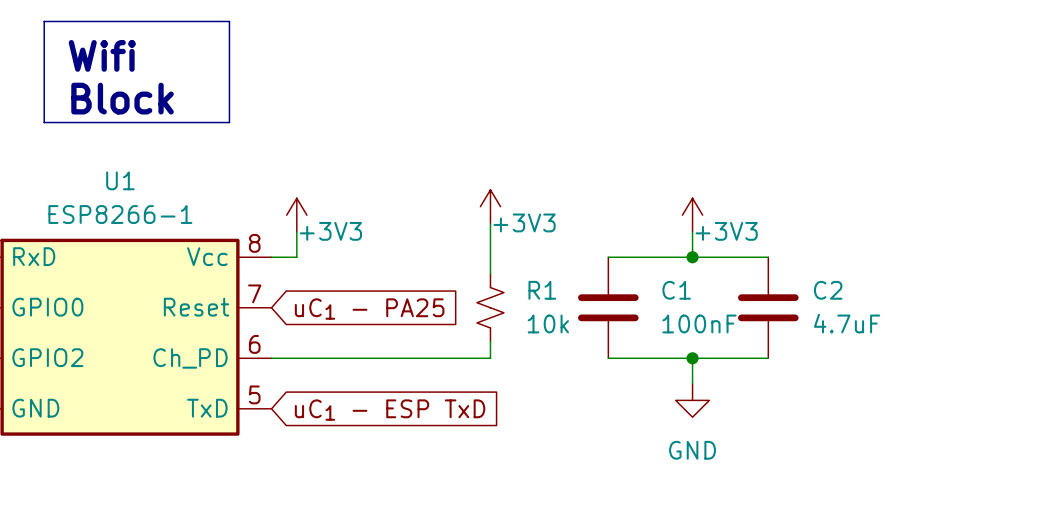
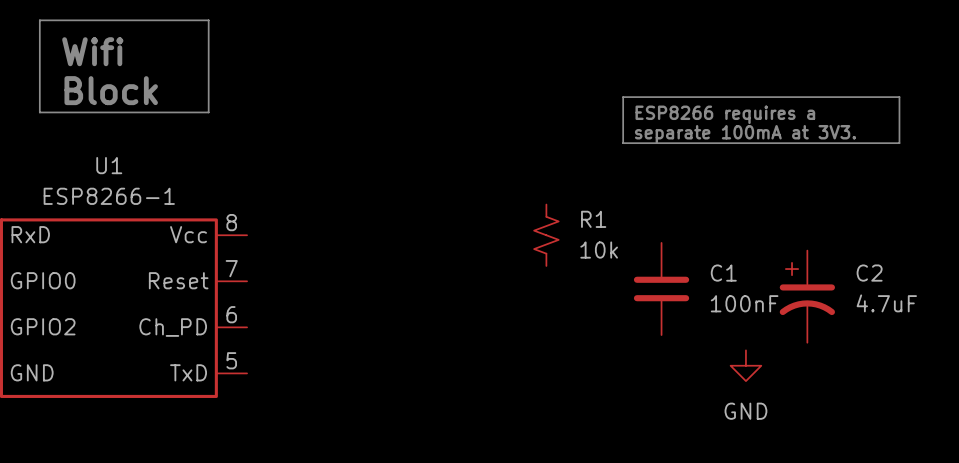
line: none -> (623, 97) (899, 97) (899, 143) (623, 143) (623, 97)
text: none -> ESP8266 requires a (725, 114)
text: none -> separate 100mA at 3V3. (745, 134)
power symbol: +3V3 (490, 206) -> none
power symbol: +3V3 (296, 215) -> none
power symbol: +3V3 (692, 215) -> none
wire: (490, 223) (490, 274) -> none
wire: (296, 231) (296, 257) (271, 257) -> none
wire: (692, 231) (692, 257) -> none
wire: (608, 257) (768, 257) -> none
junction: (692, 257) -> none
C2 symbol: [738, 257, 799, 359] -> [779, 250, 836, 343]
R1 position: (490, 307) -> (546, 235)
C1 position: (608, 307) -> (661, 288)
global label: uC1 - PA25 (369, 309) -> none
wire: (490, 341) (490, 358) (271, 358) -> none
wire: (608, 358) (768, 358) -> none
wire: (692, 358) (692, 383) -> none
junction: (692, 358) -> none
power symbol position: GND (692, 400) -> GND (745, 365)
global label: uC1 - ESP TxD (390, 410) -> none

